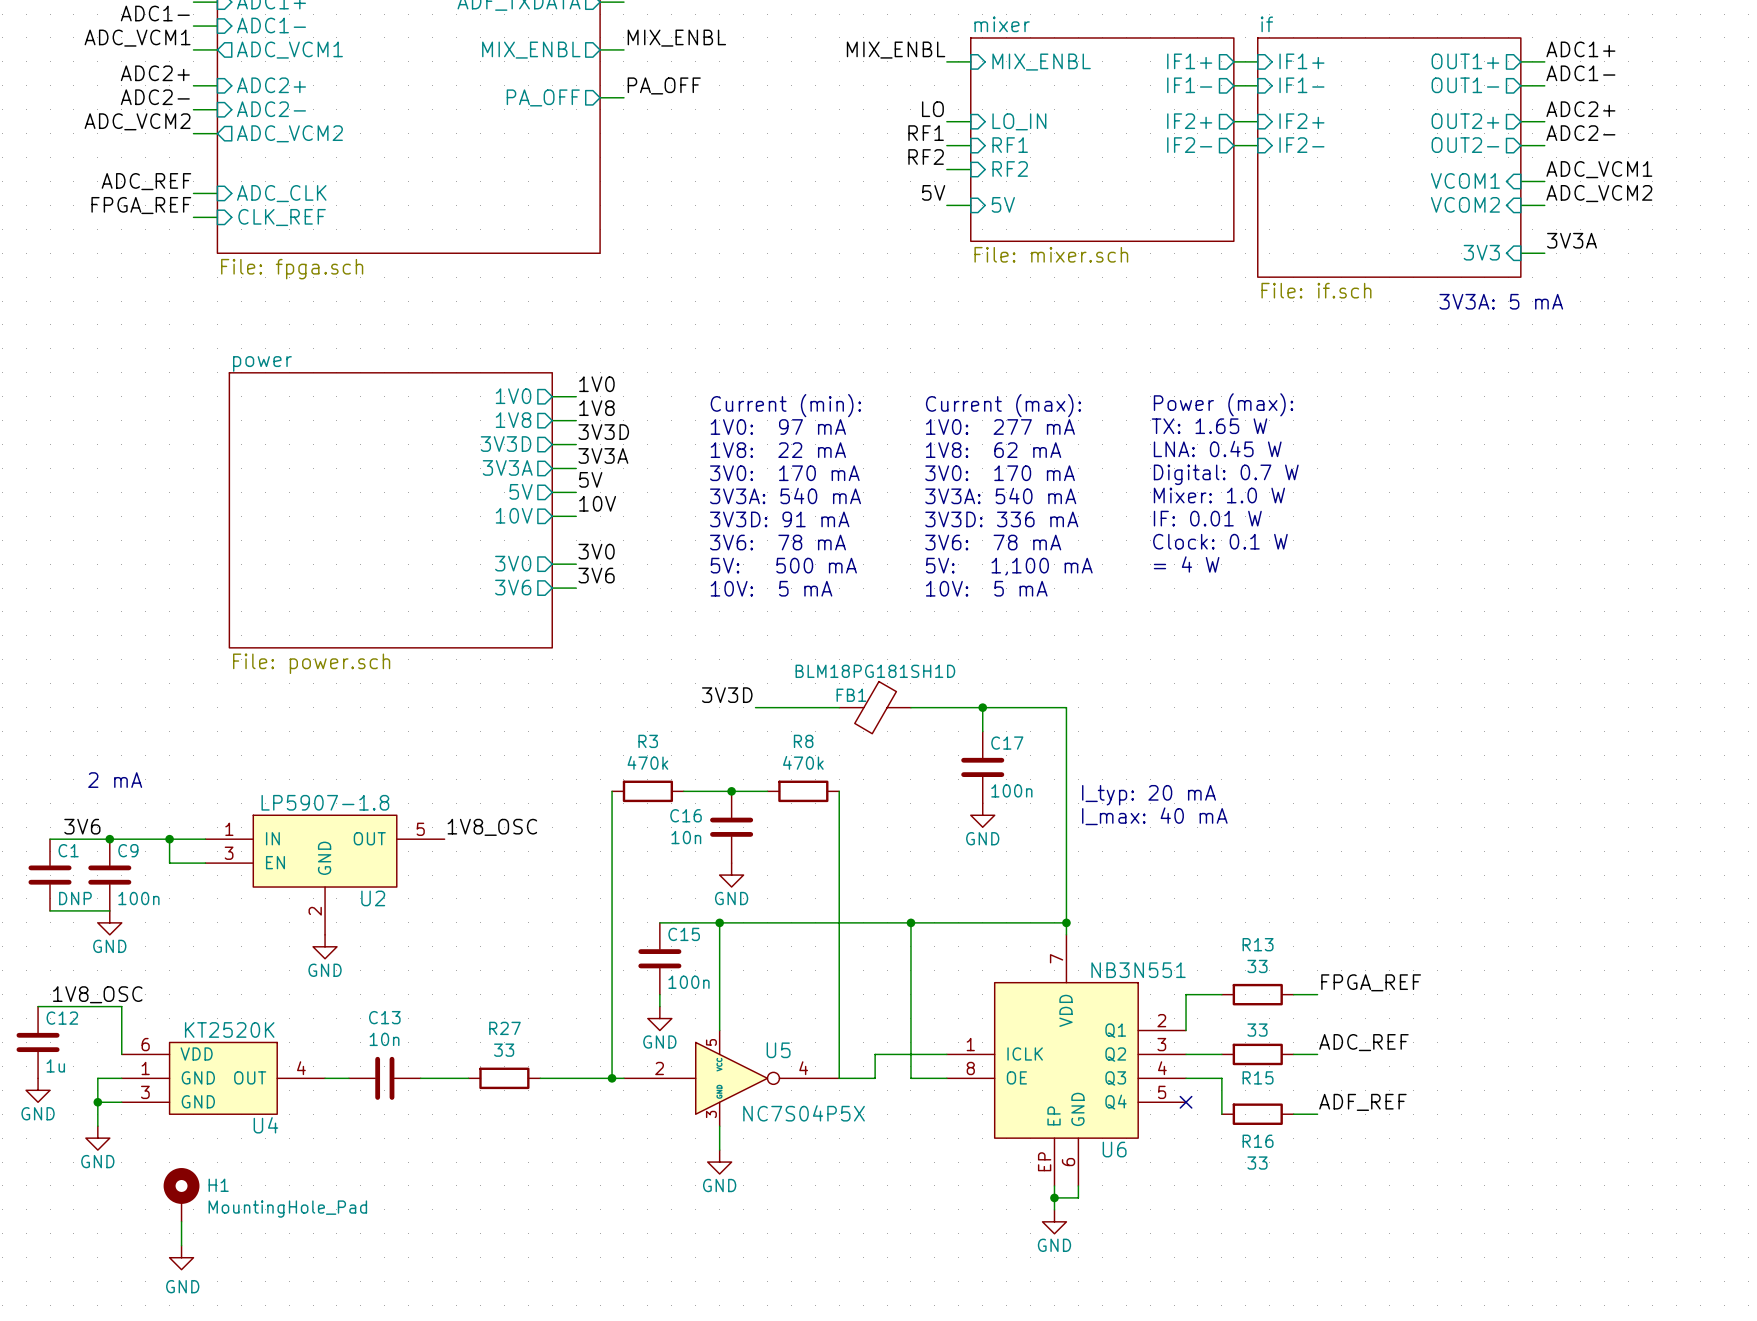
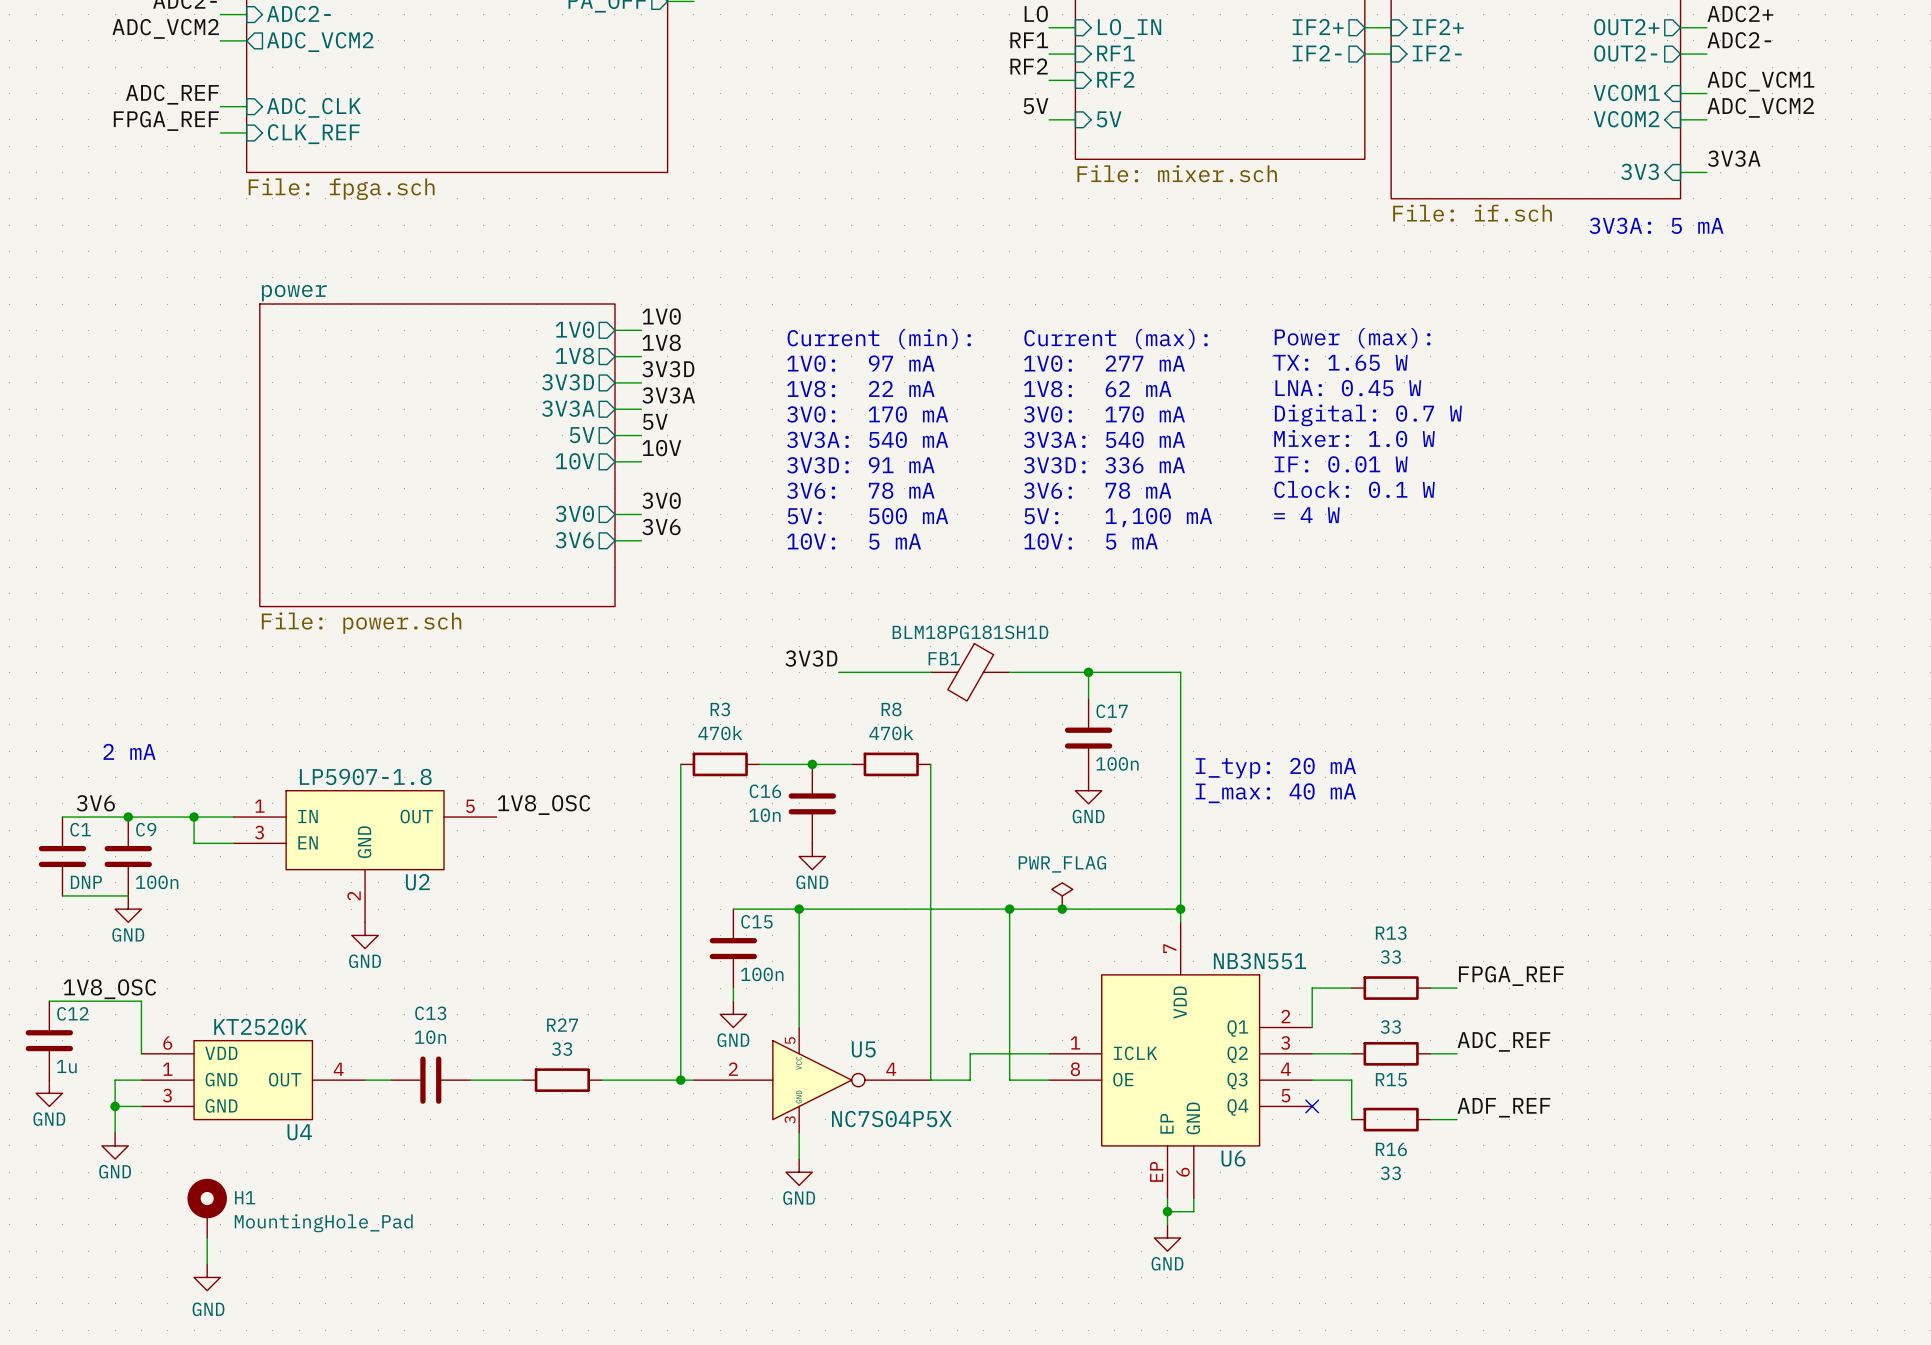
power symbol: none -> PWR_FLAG (1062, 895)
junction: none -> (1062, 909)

